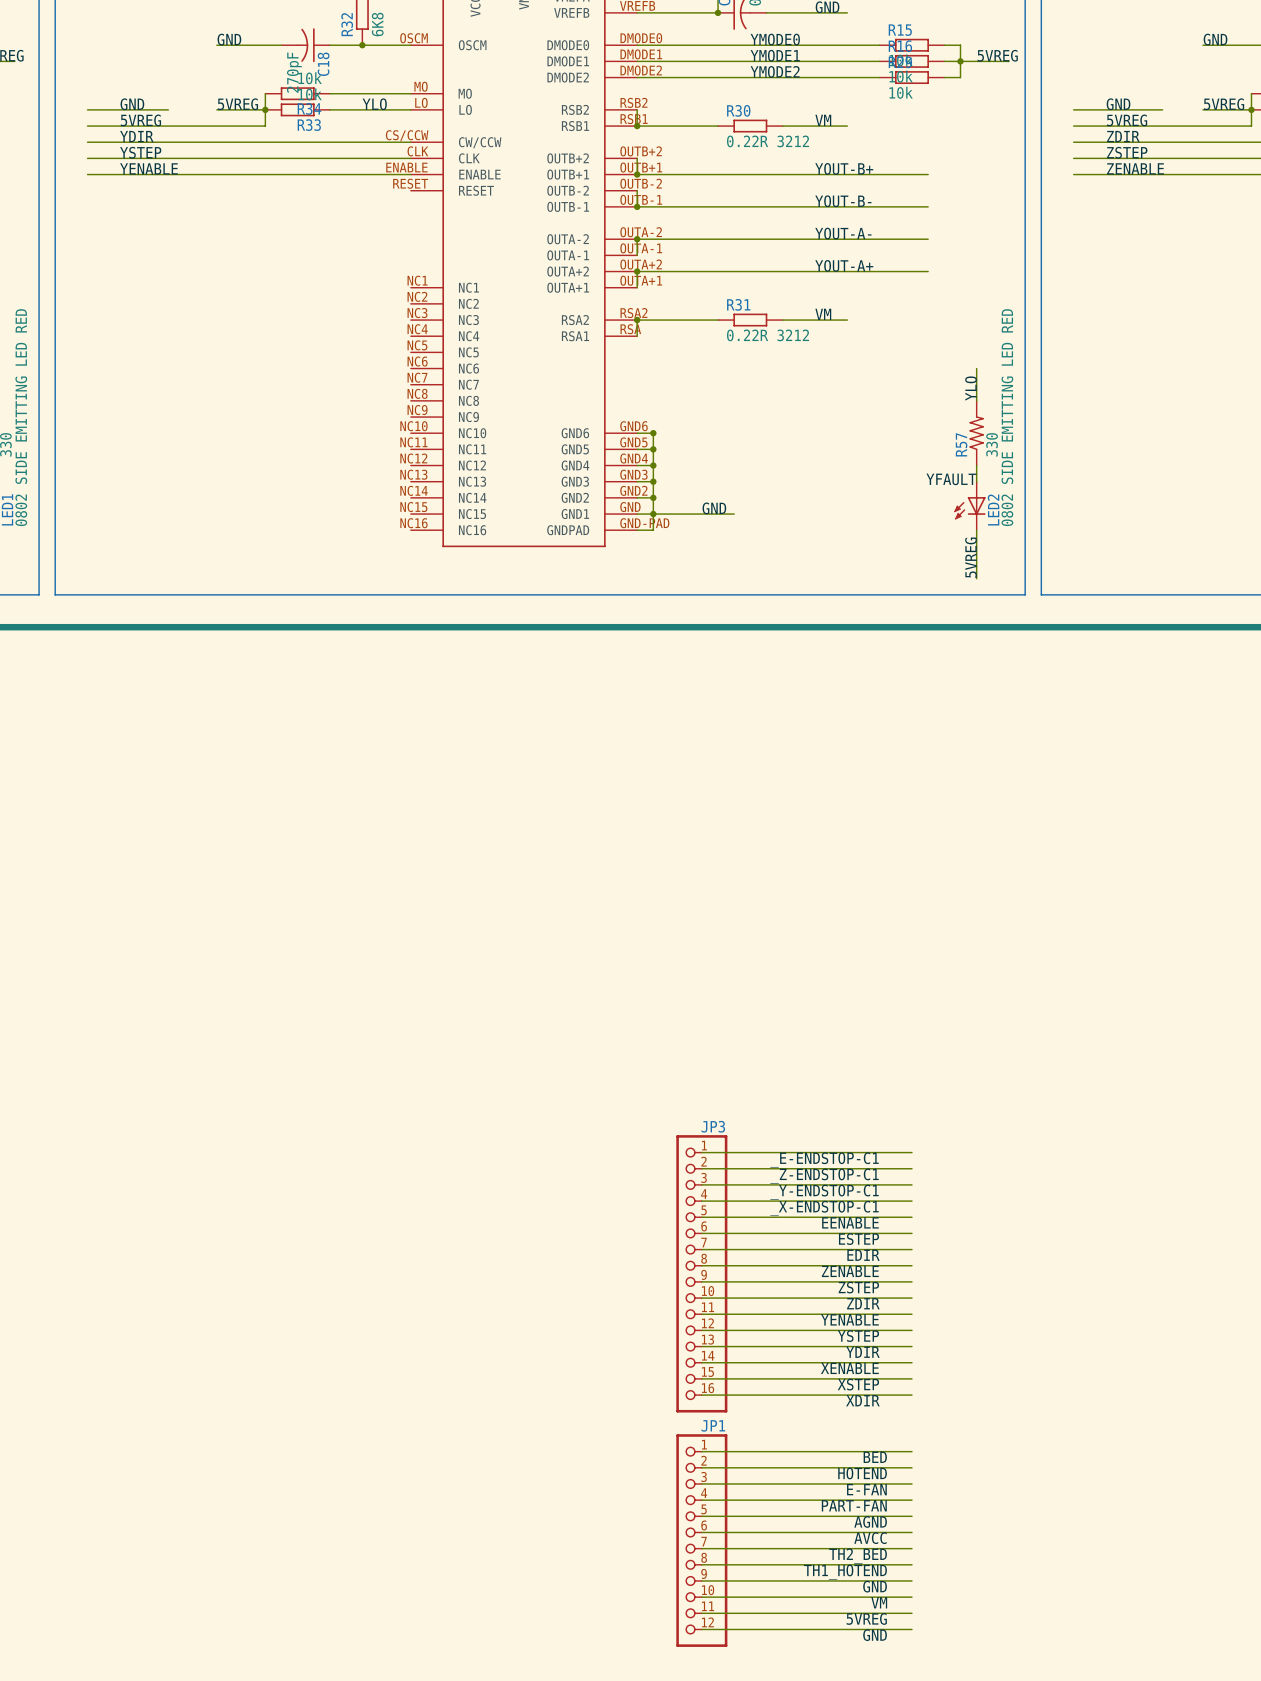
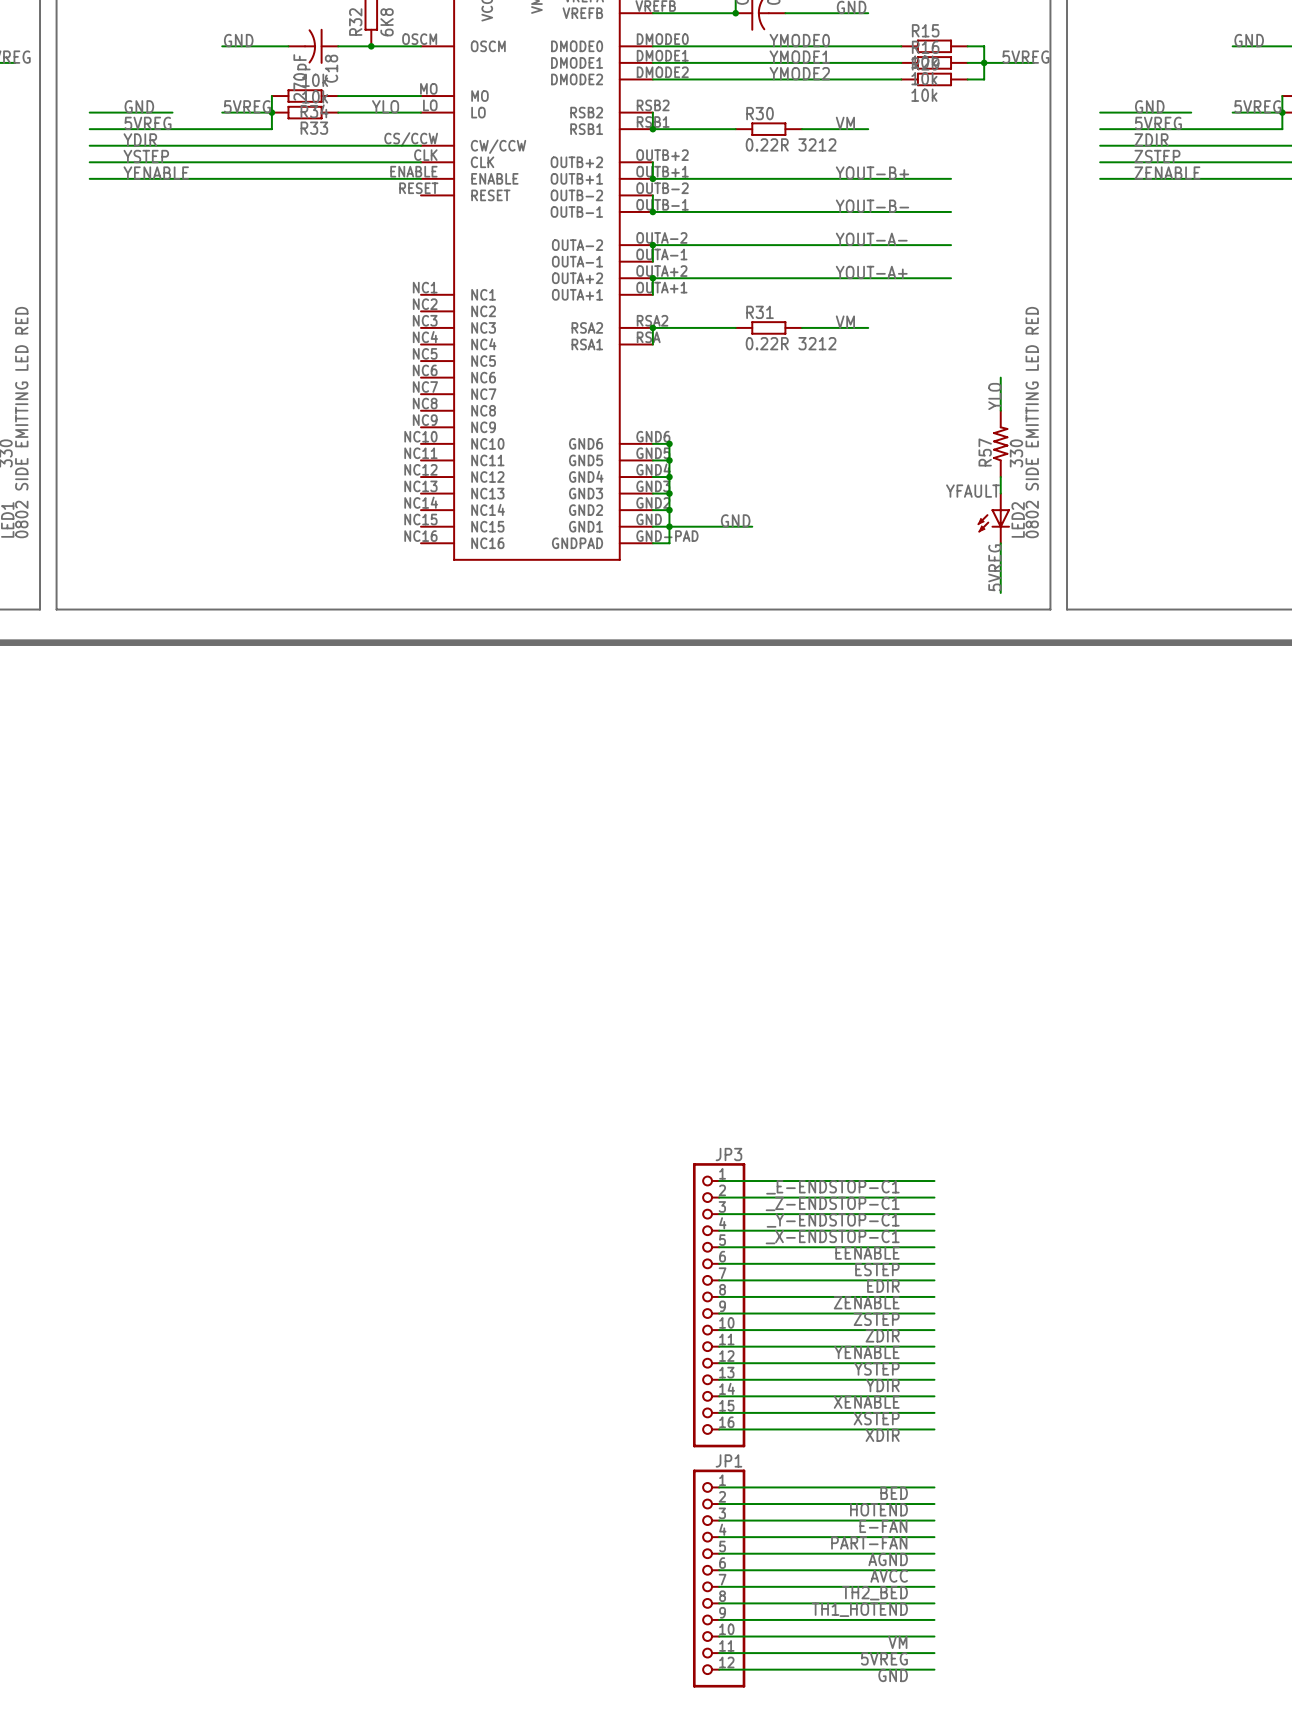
label: GND (875, 1586) -> none

